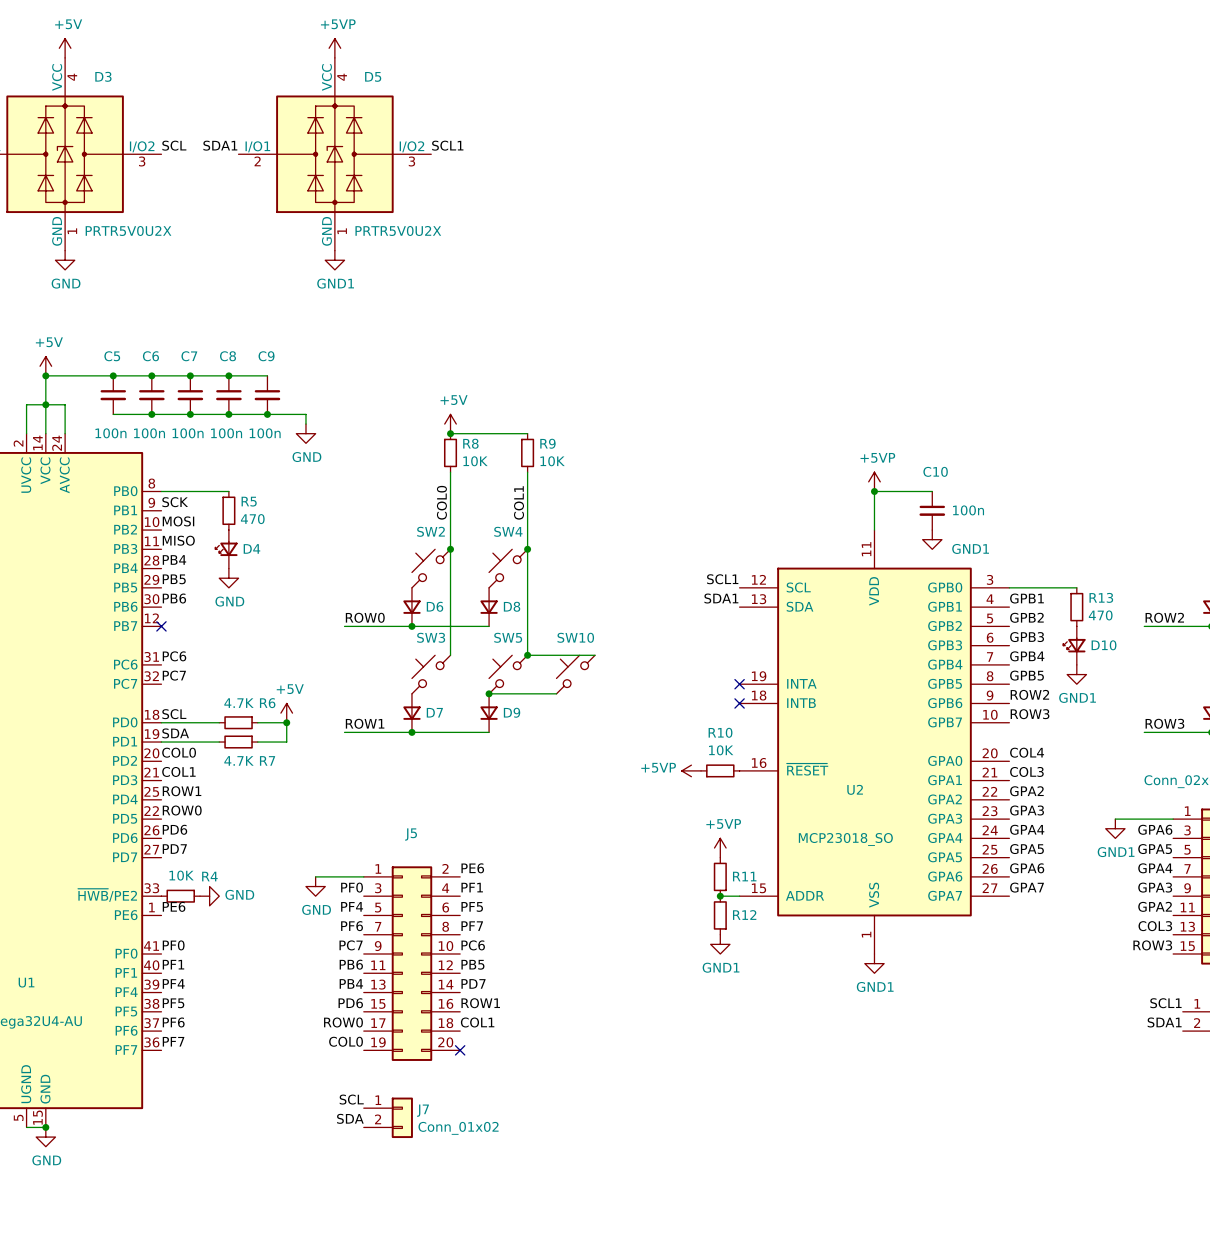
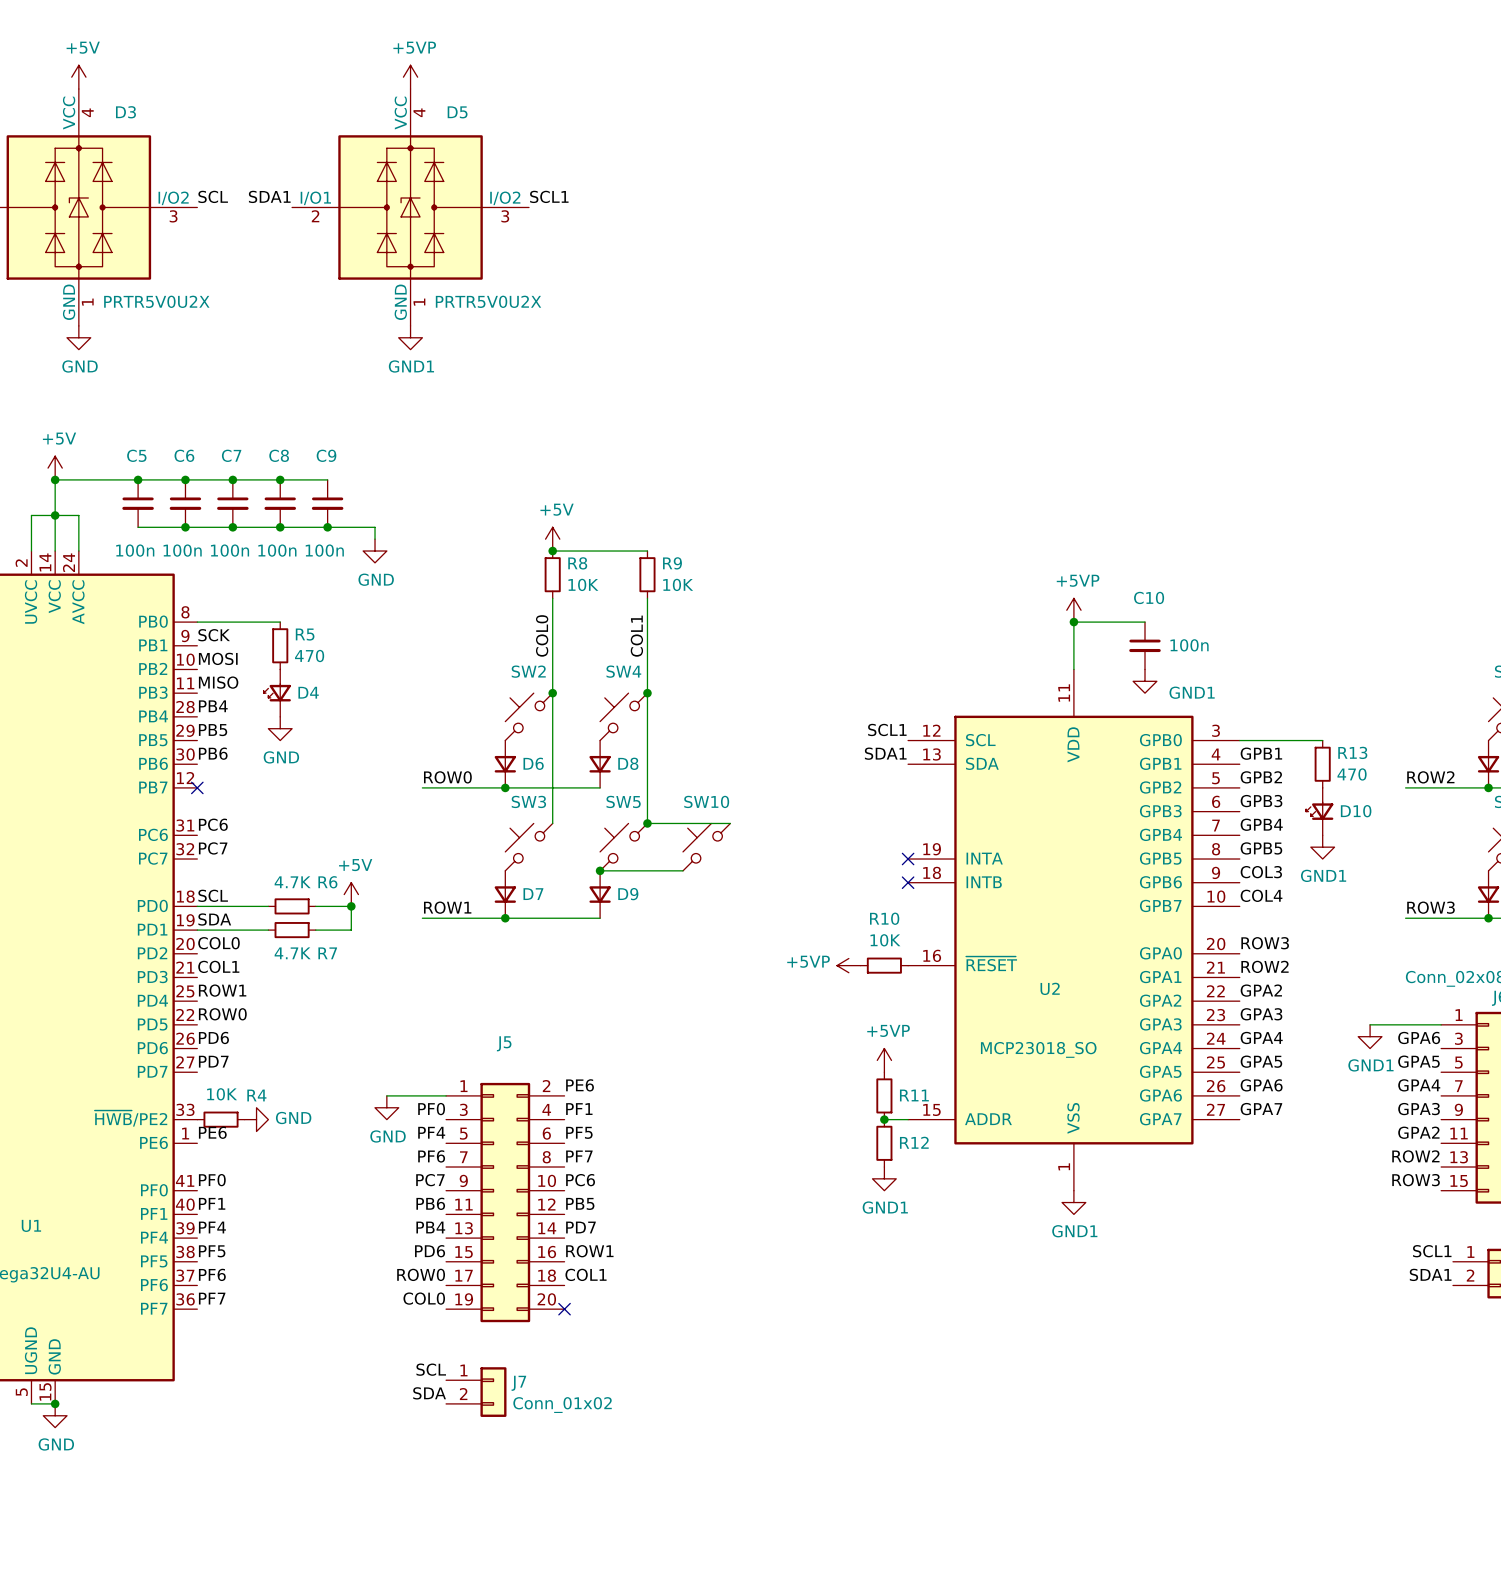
label: ROW2 (1029, 694) -> COL3 (1261, 872)
label: ROW3 (1030, 714) -> COL4 (1261, 895)
label: COL4 (1027, 752) -> ROW3 (1265, 943)
label: COL3 (1026, 771) -> ROW2 (1264, 966)
label: COL3 (1155, 926) -> ROW2 (1415, 1156)

